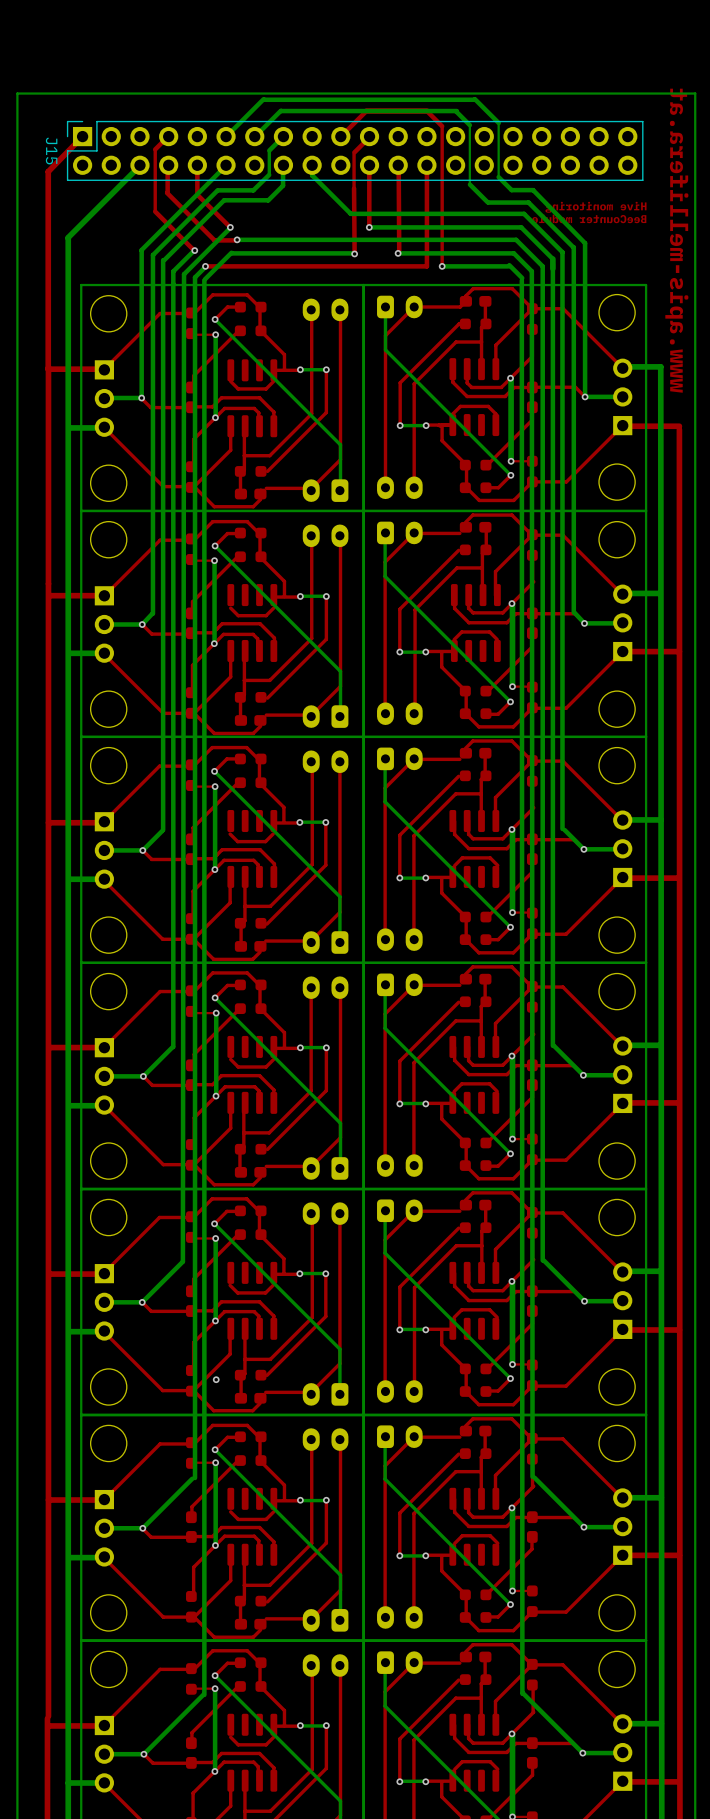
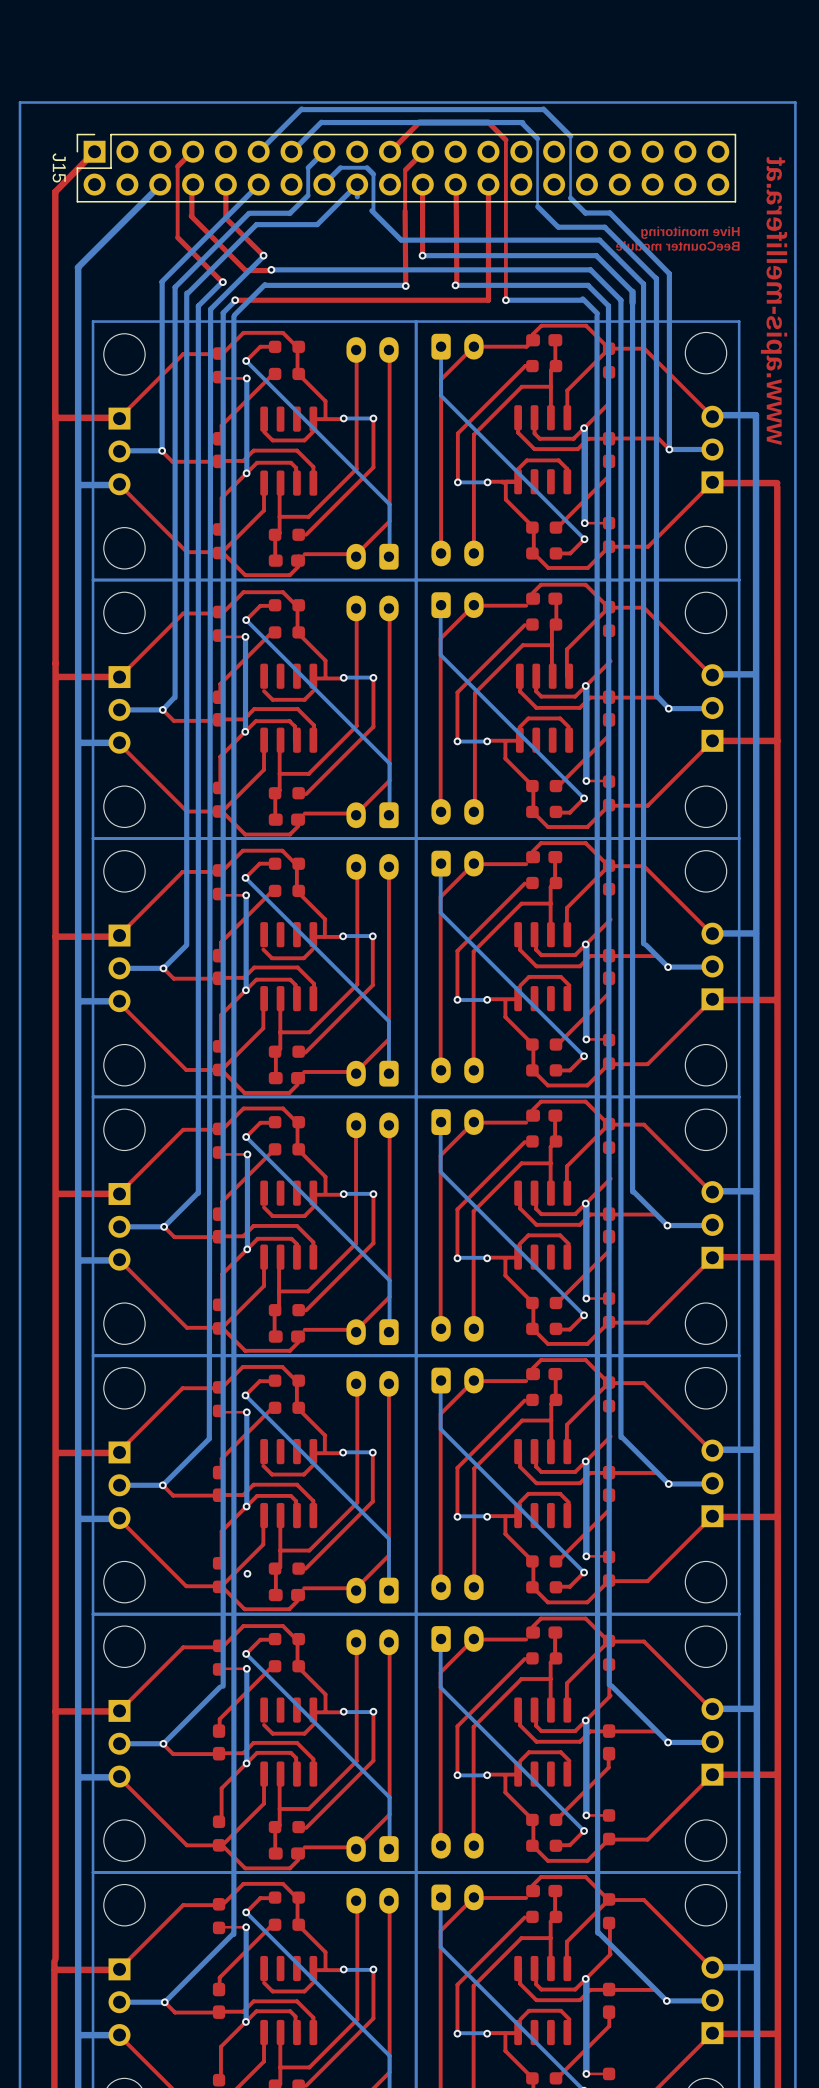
bottom track: none -> (323, 184) (340, 167) (366, 167) (373, 174) (373, 210)
bottom track: (283, 166) (283, 185) (268, 200) -> (356, 185) (317, 224) (306, 224)
bottom track: (312, 176) (350, 213) -> (371, 210) (400, 239)

